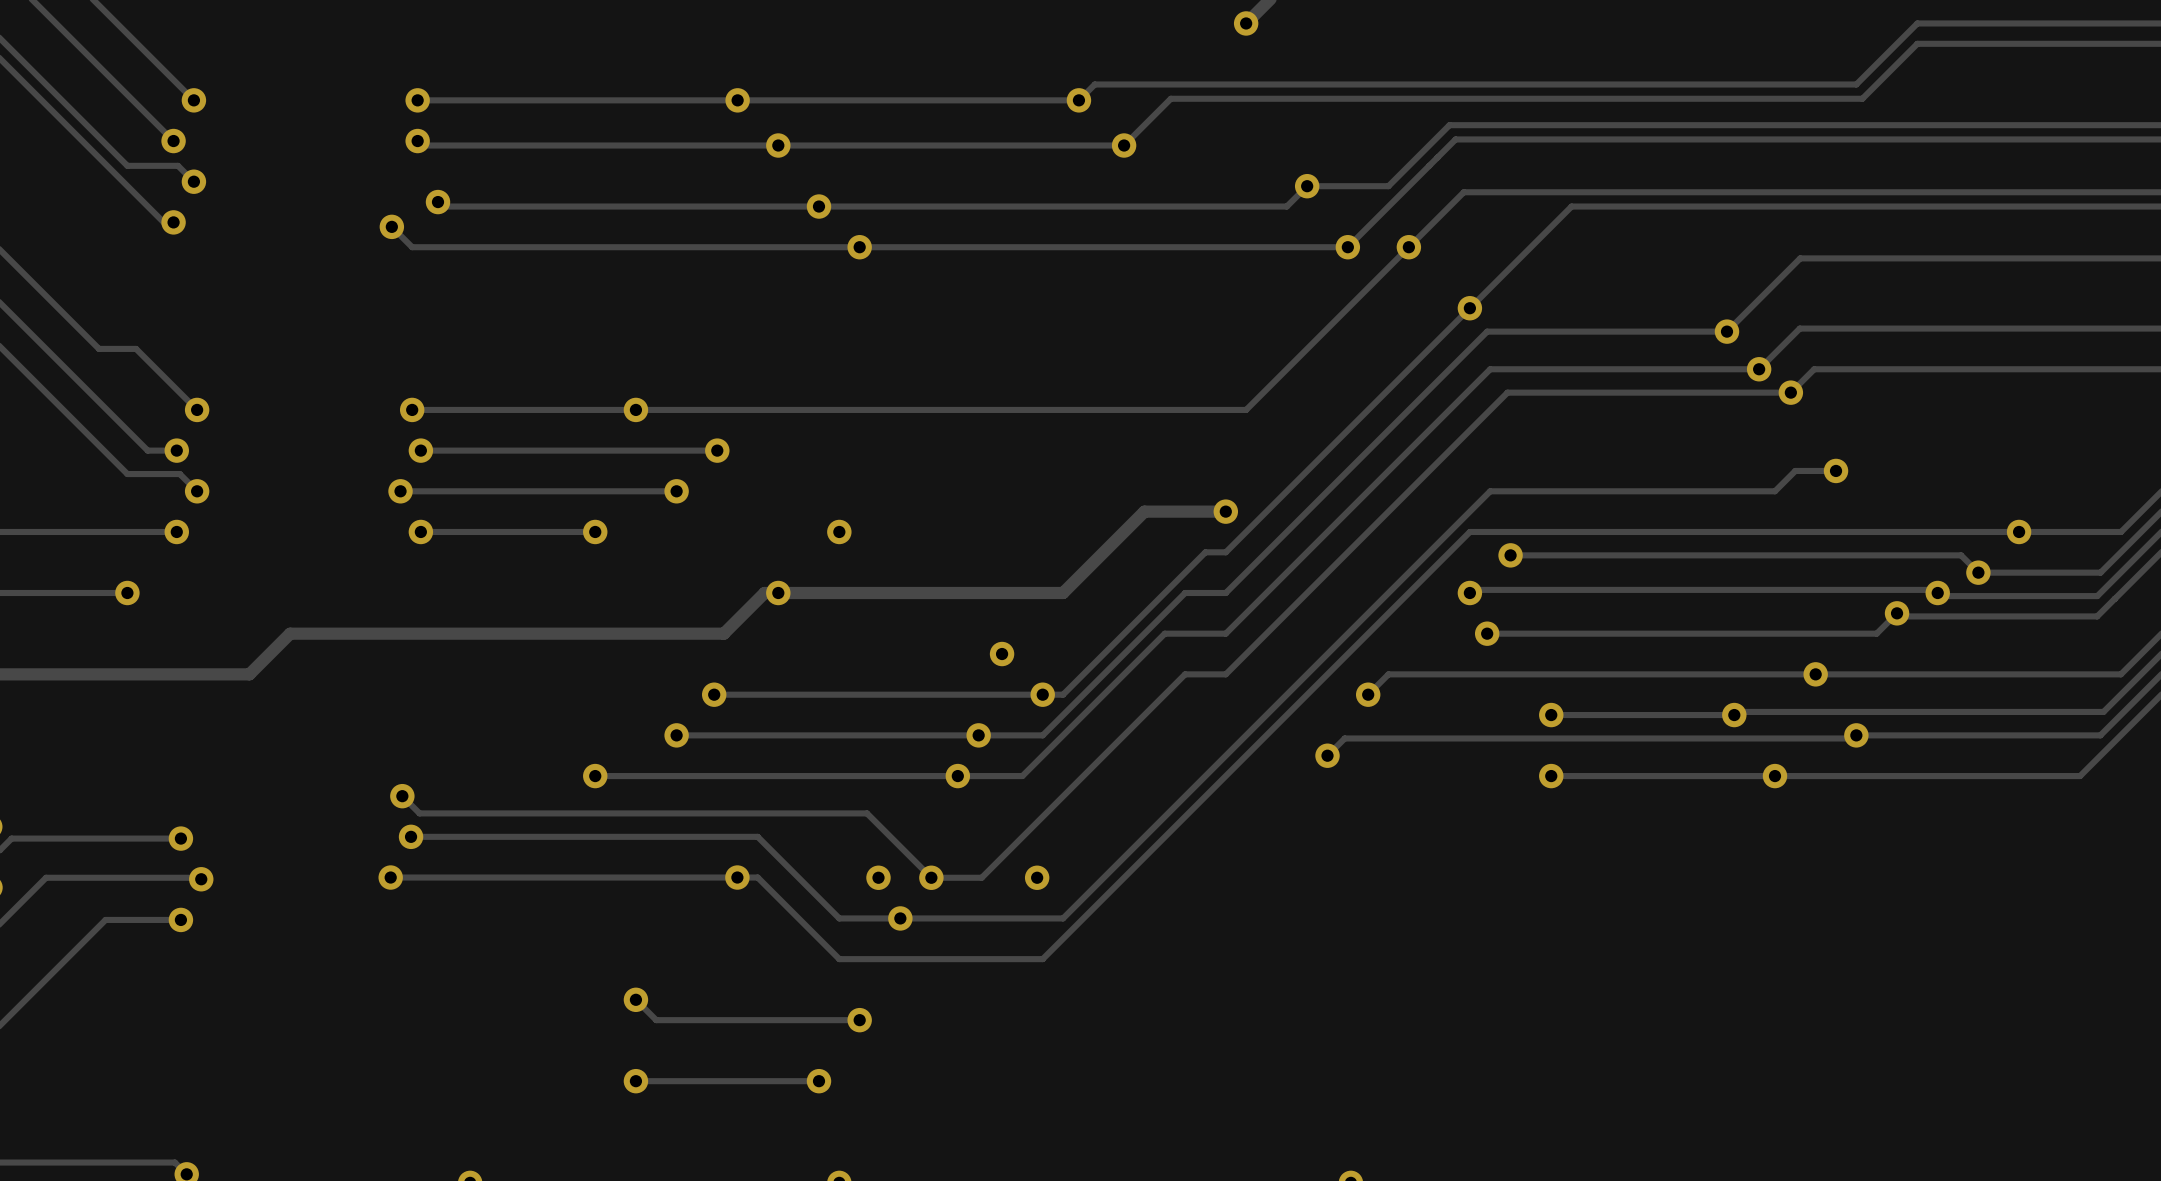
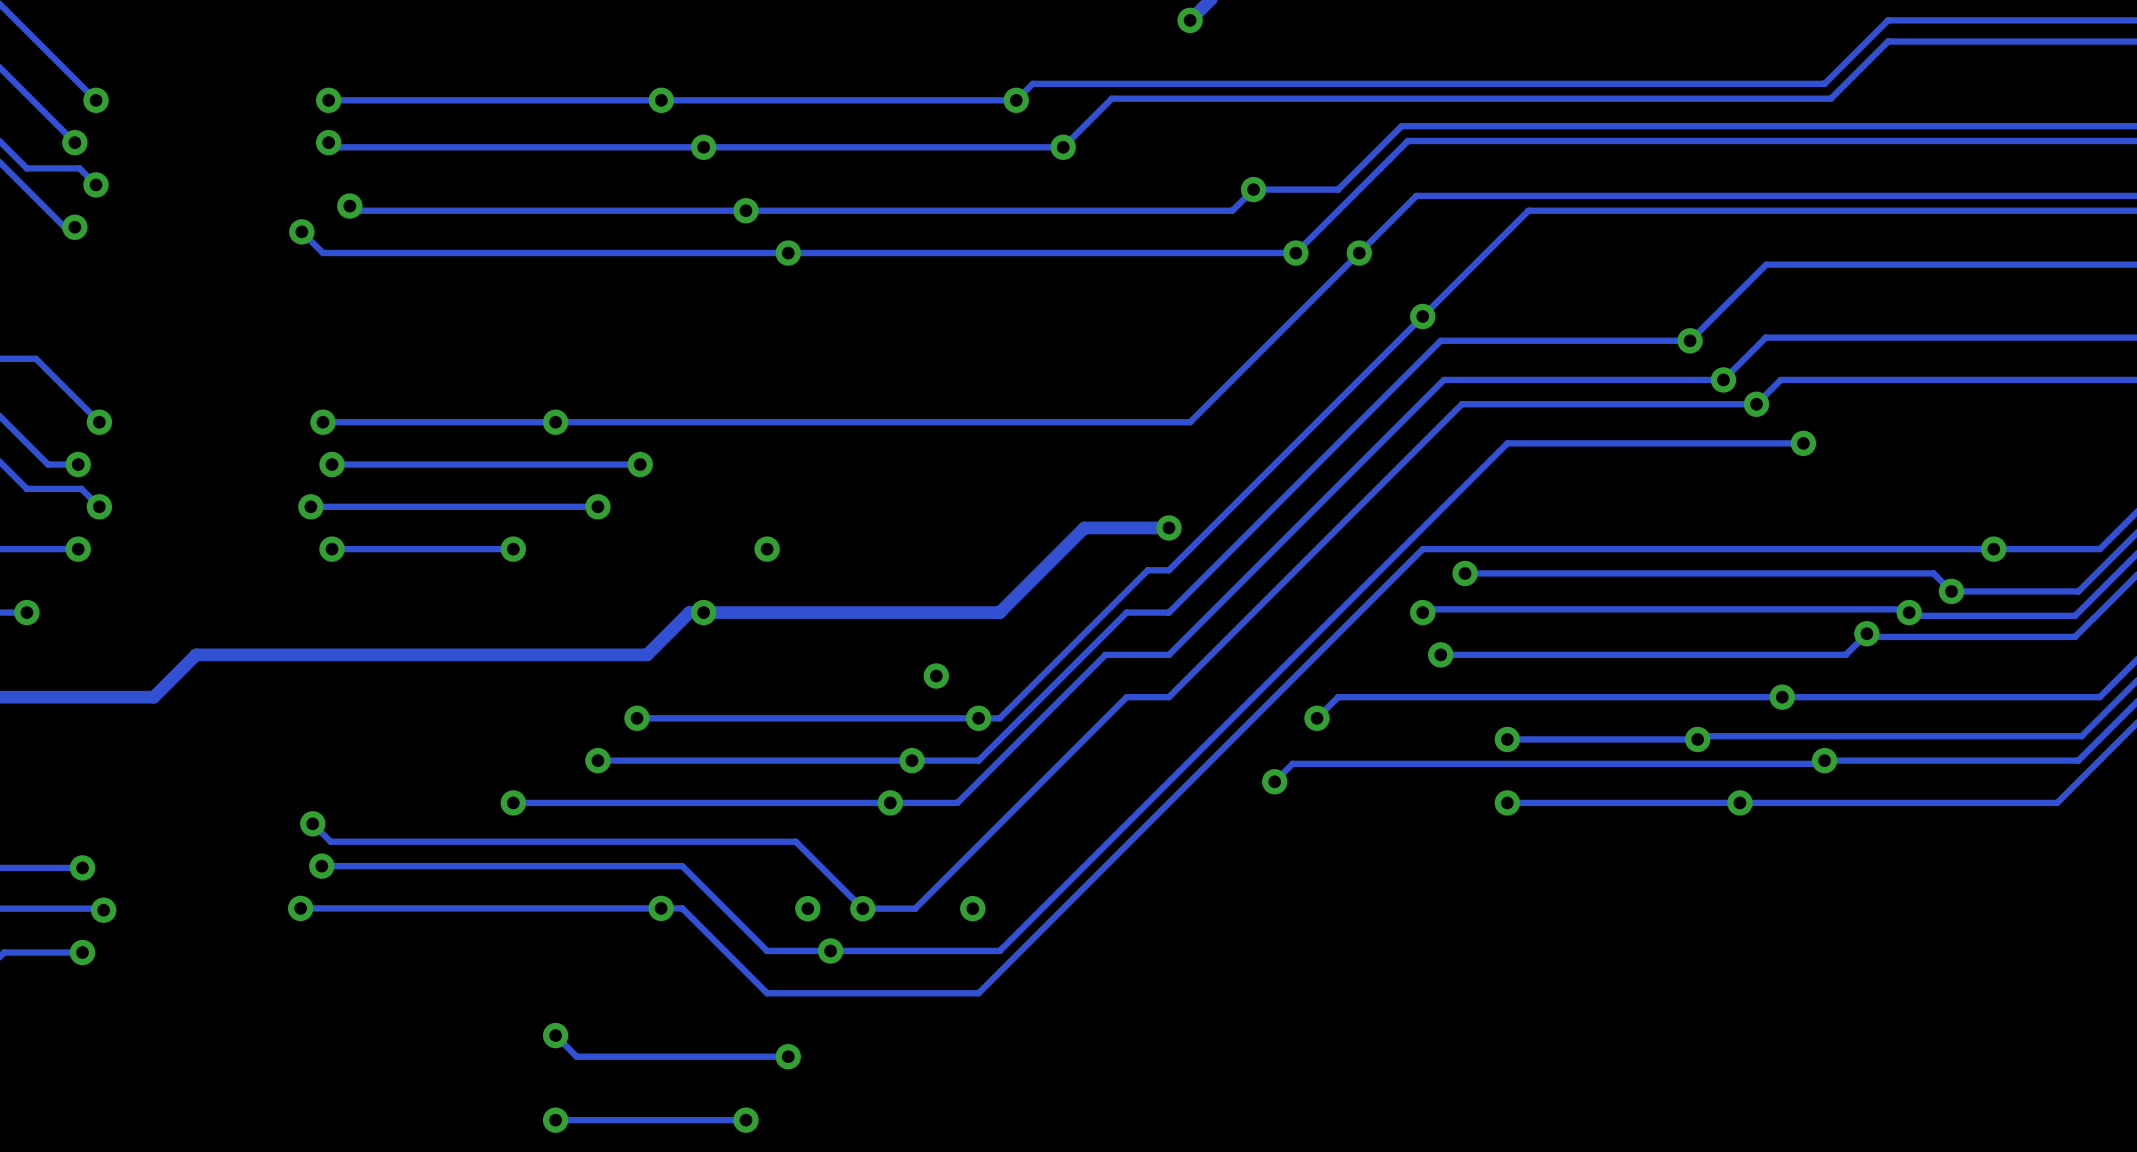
track: (1836, 470) (1795, 470) (1775, 491) (1490, 491) -> (1803, 443) (1507, 443) (1443, 506)
via position: (1836, 470) -> (1803, 443)

